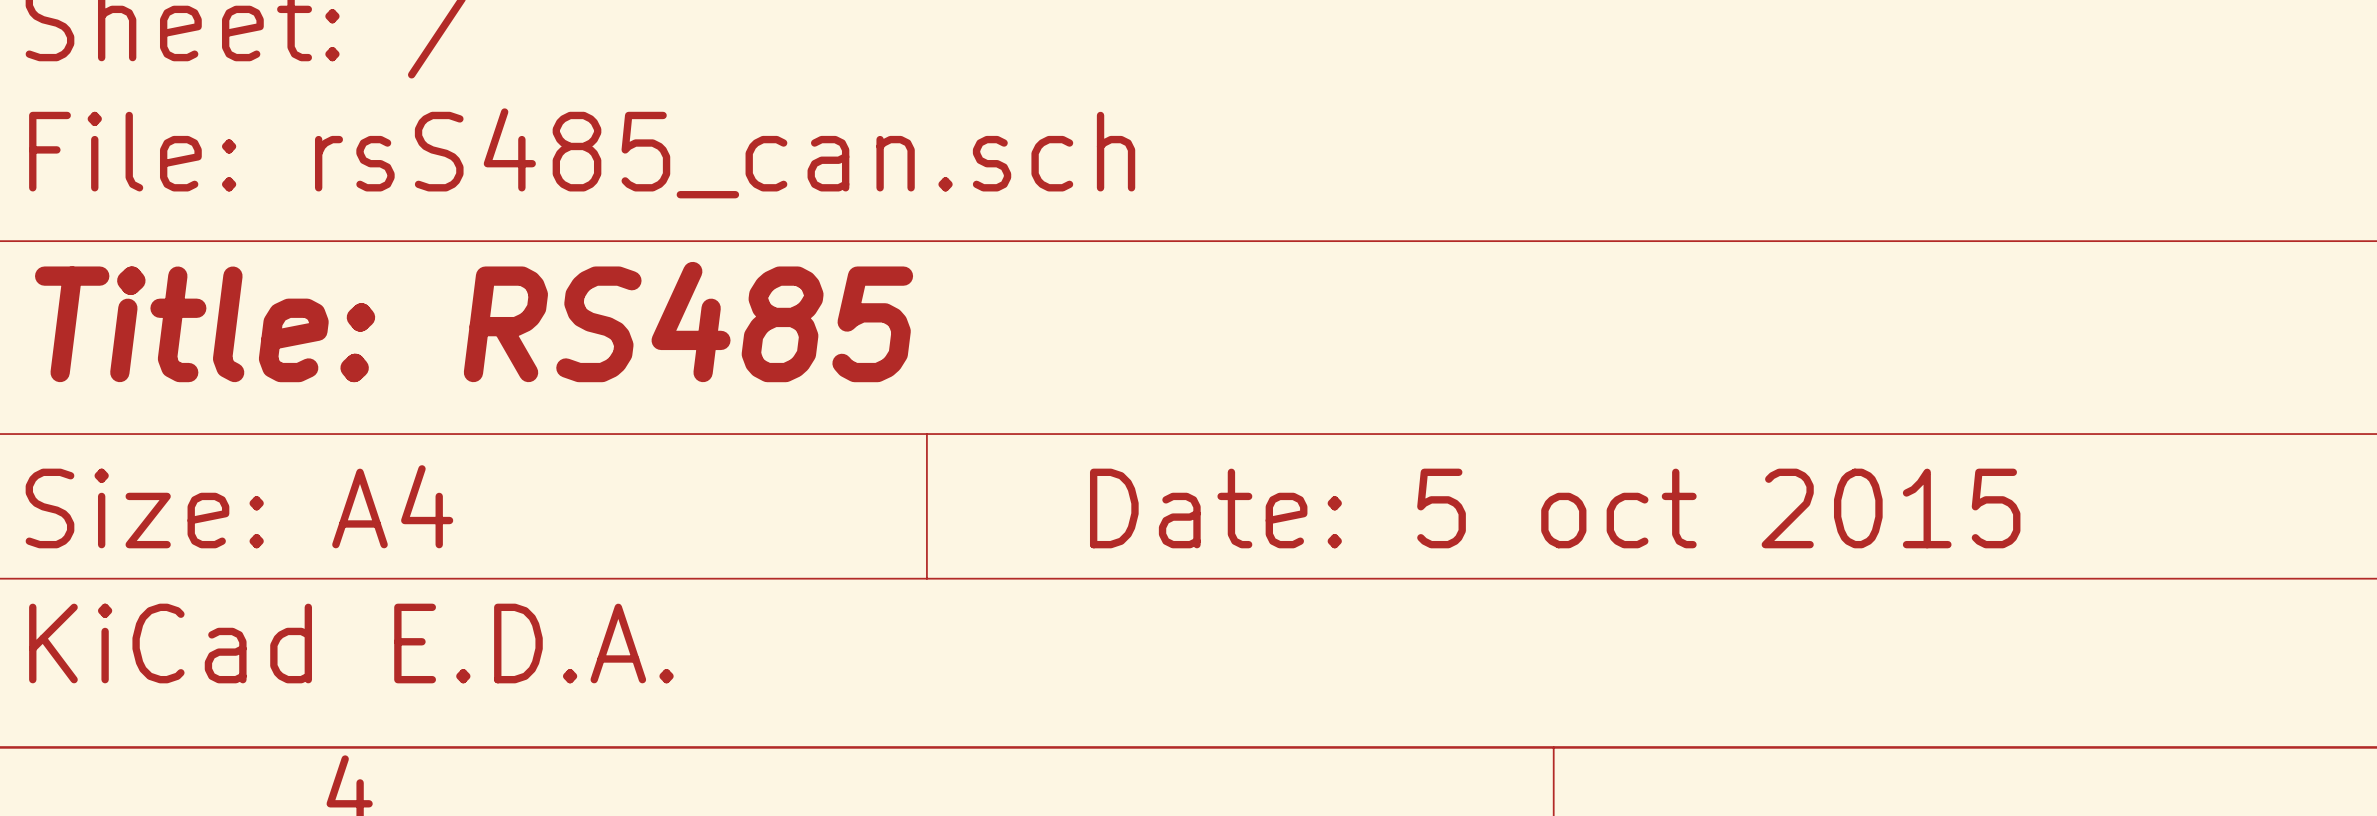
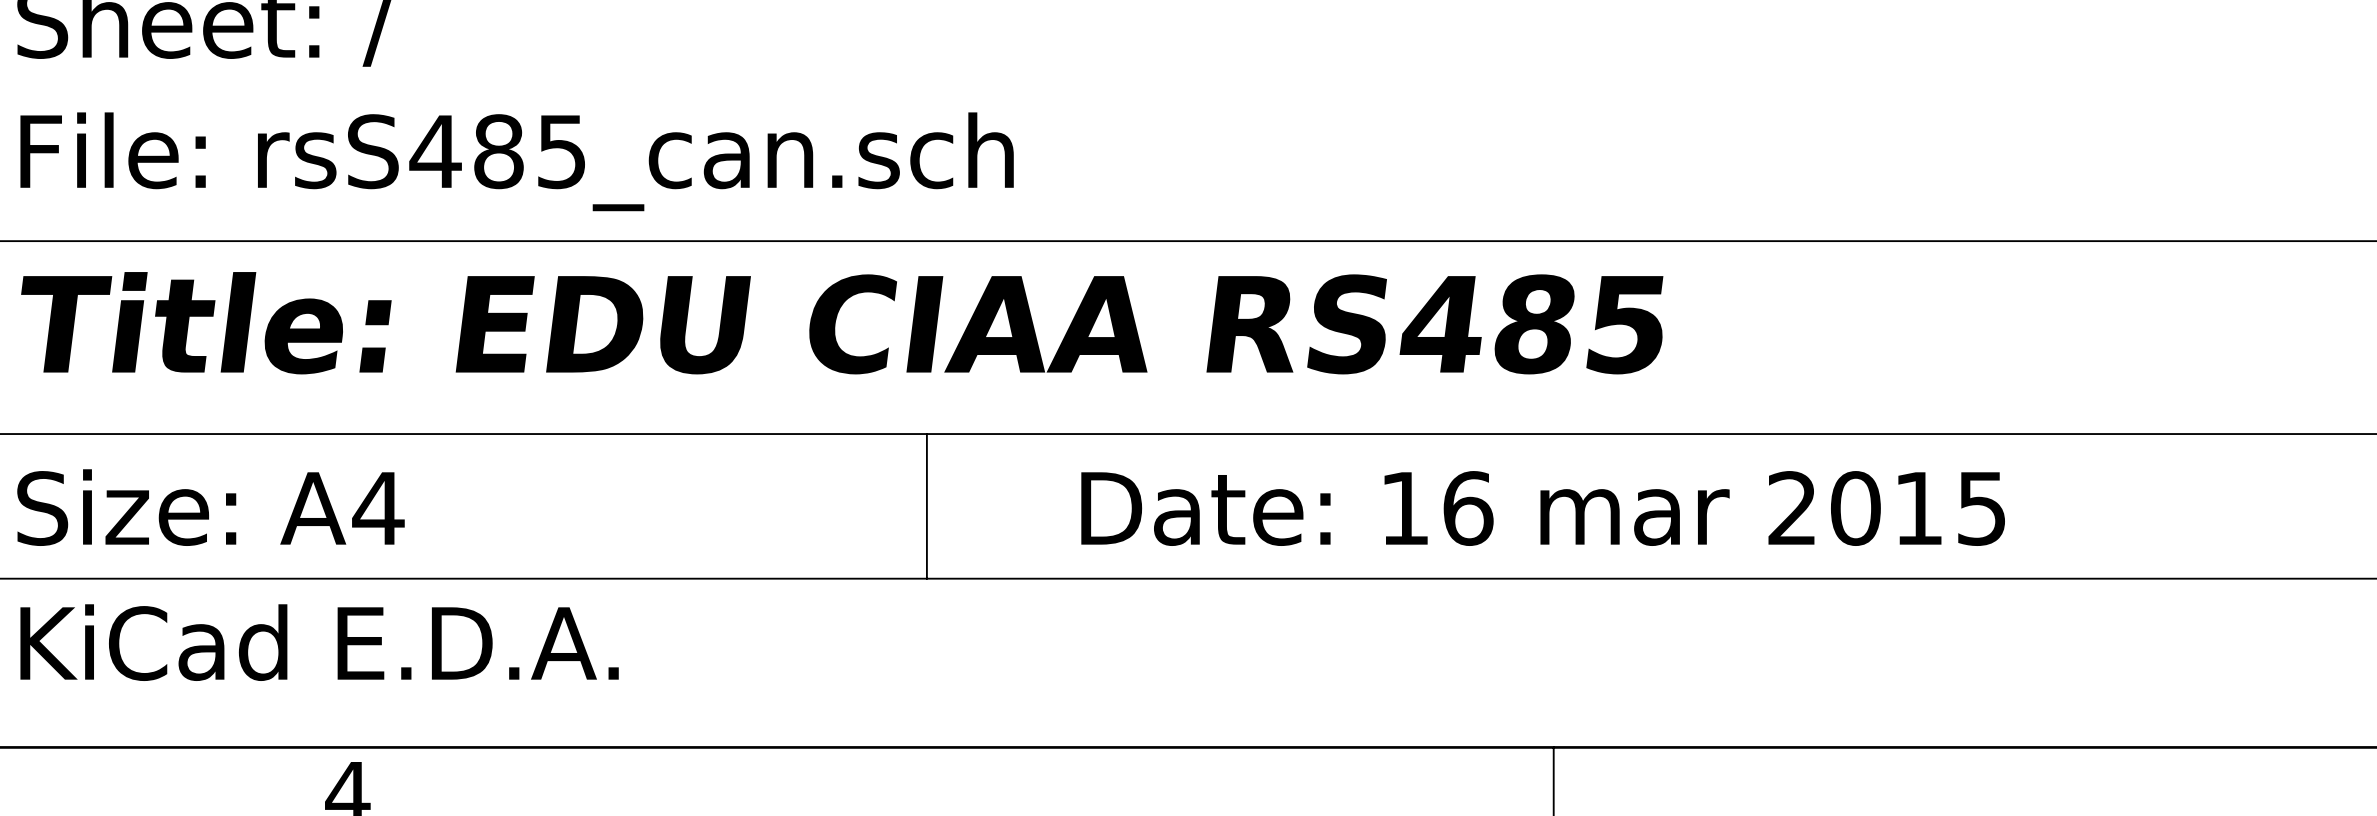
title block: Title: RS485 (474, 322) -> Title: EDU CIAA RS485 (842, 323)
title block: Date: 5 oct 2015 (1555, 508) -> Date: 16 mar 2015 (1543, 508)

